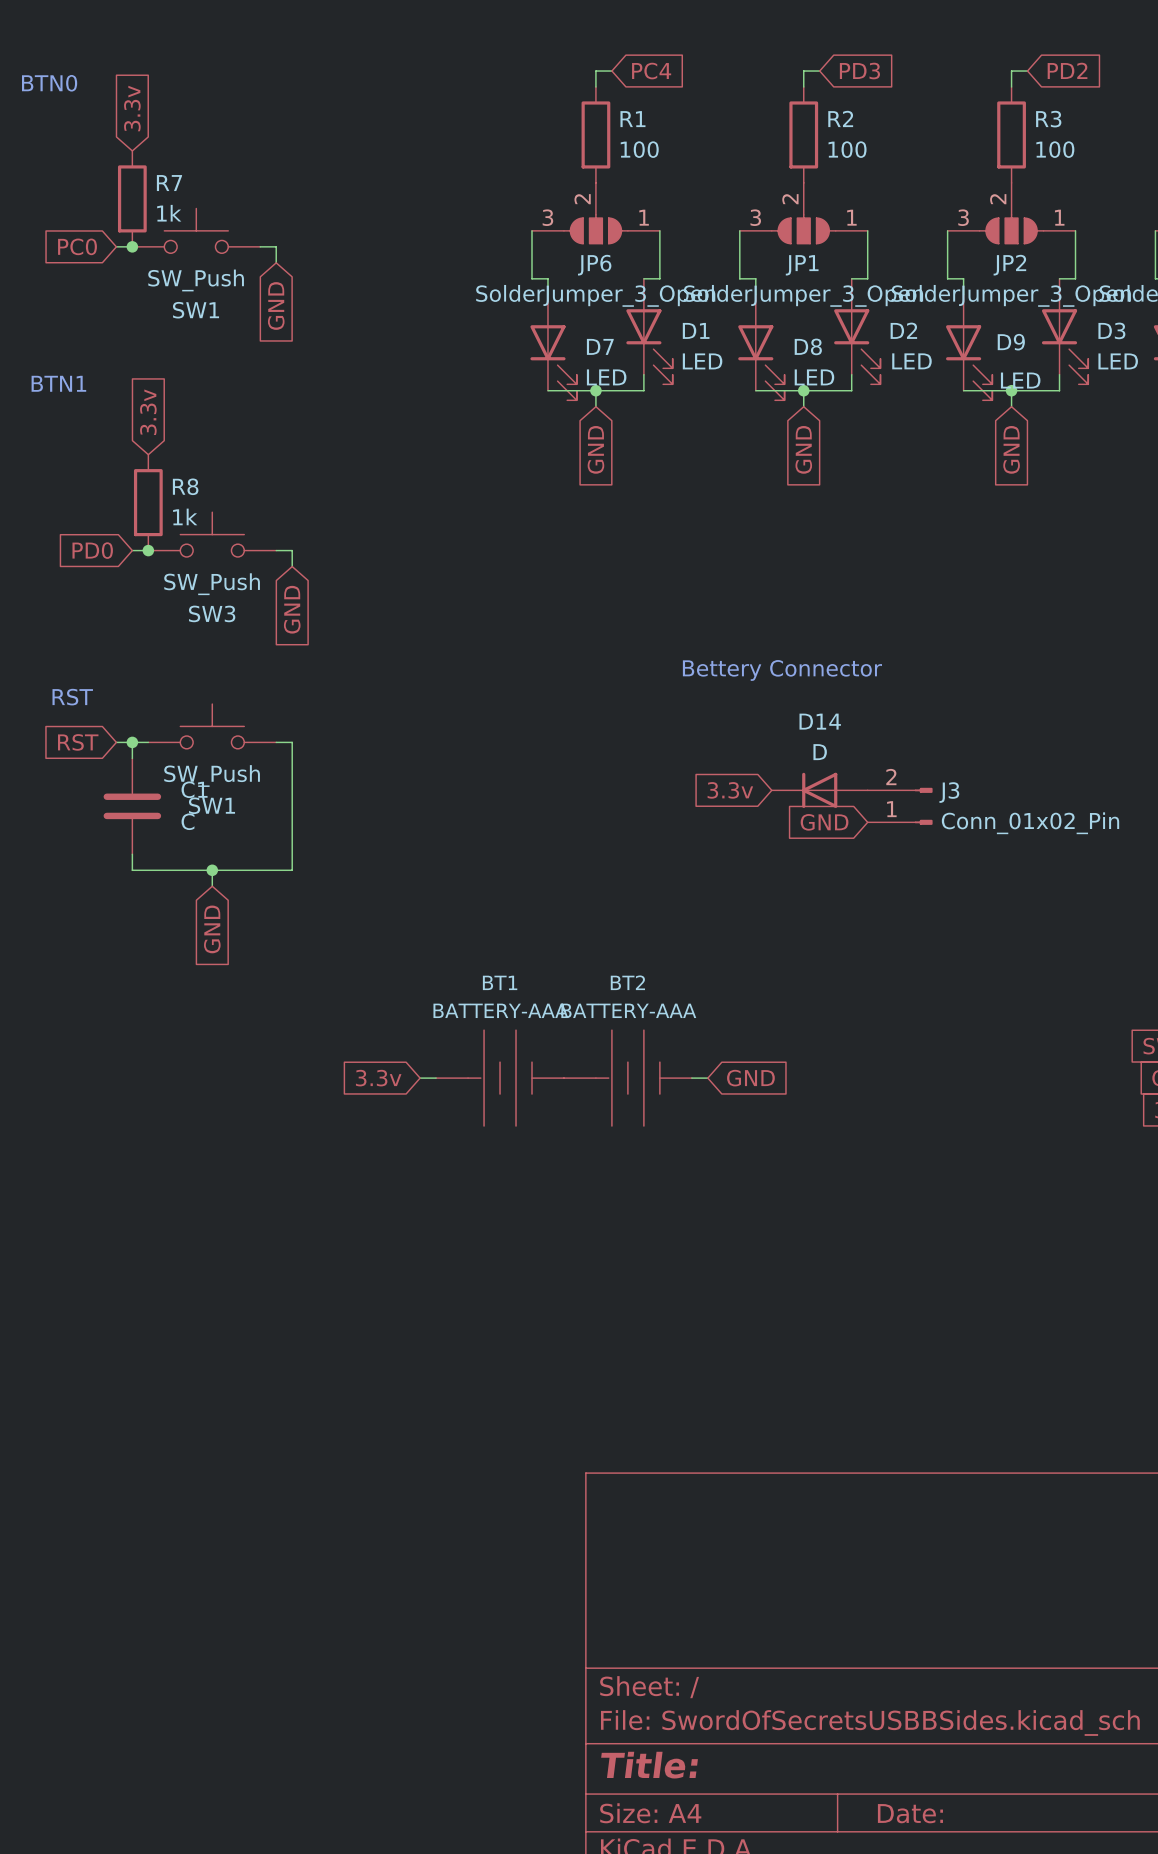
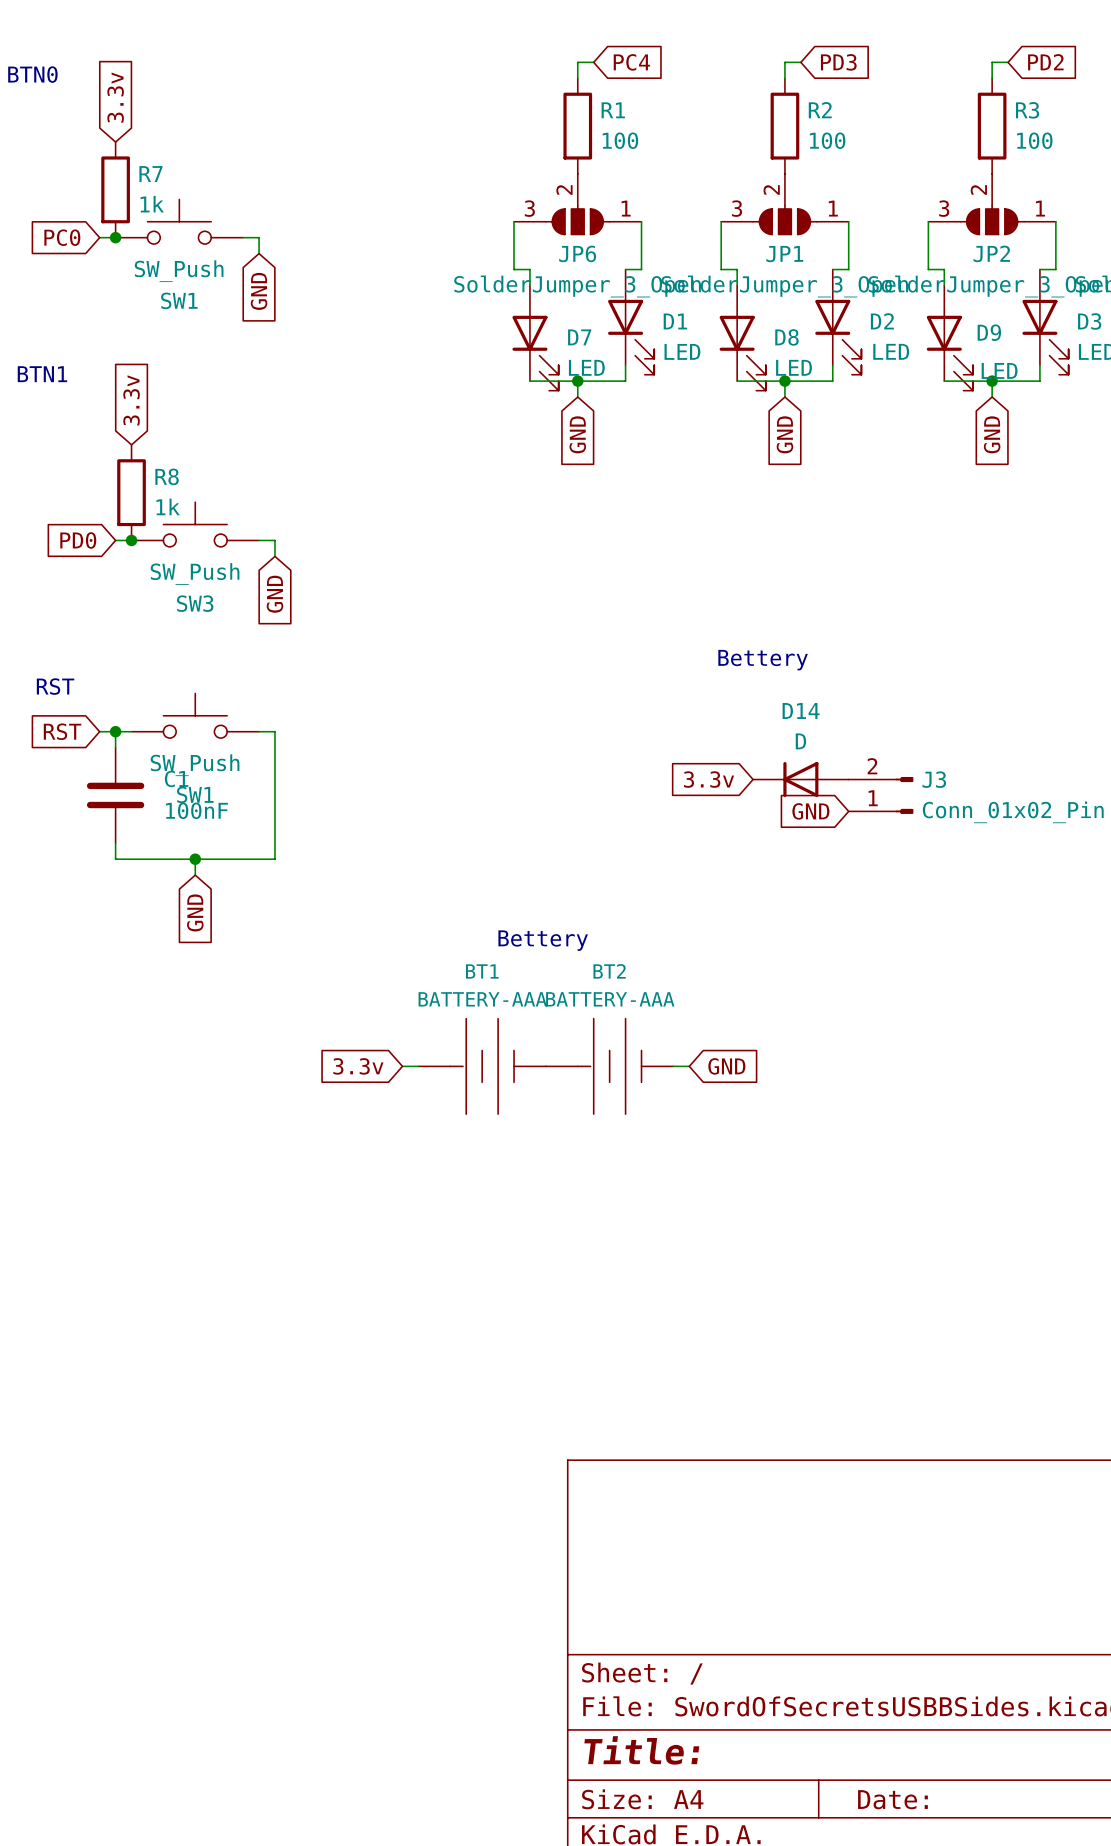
text: Bettery Connector (782, 670) -> Bettery (763, 660)
C1 value: C (187, 821) -> 100nF (196, 810)
text: none -> Bettery (543, 940)

